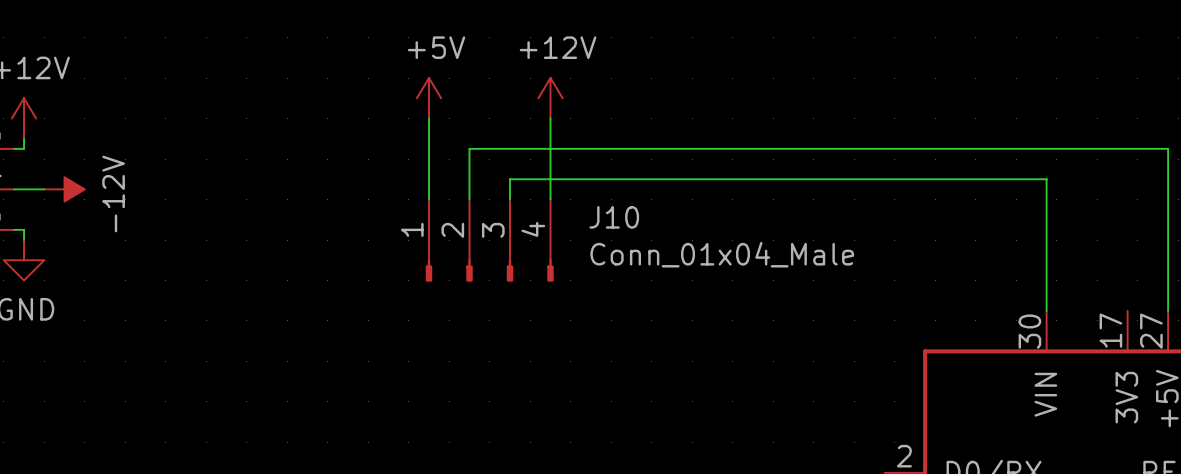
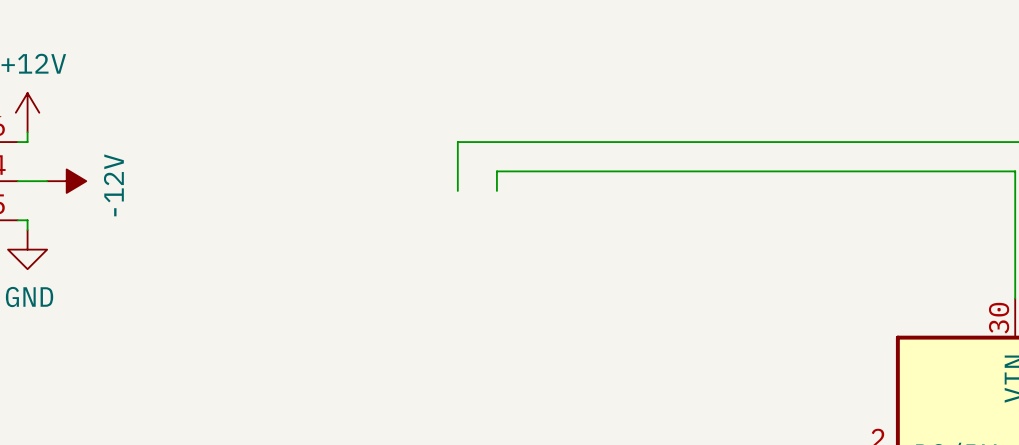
power symbol: +5V (429, 98) -> none
power symbol: +12V (550, 98) -> none
wire: (429, 118) (429, 199) -> none
wire: (550, 118) (550, 199) -> none
J10: Conn_01x04_Male (489, 240) -> none

